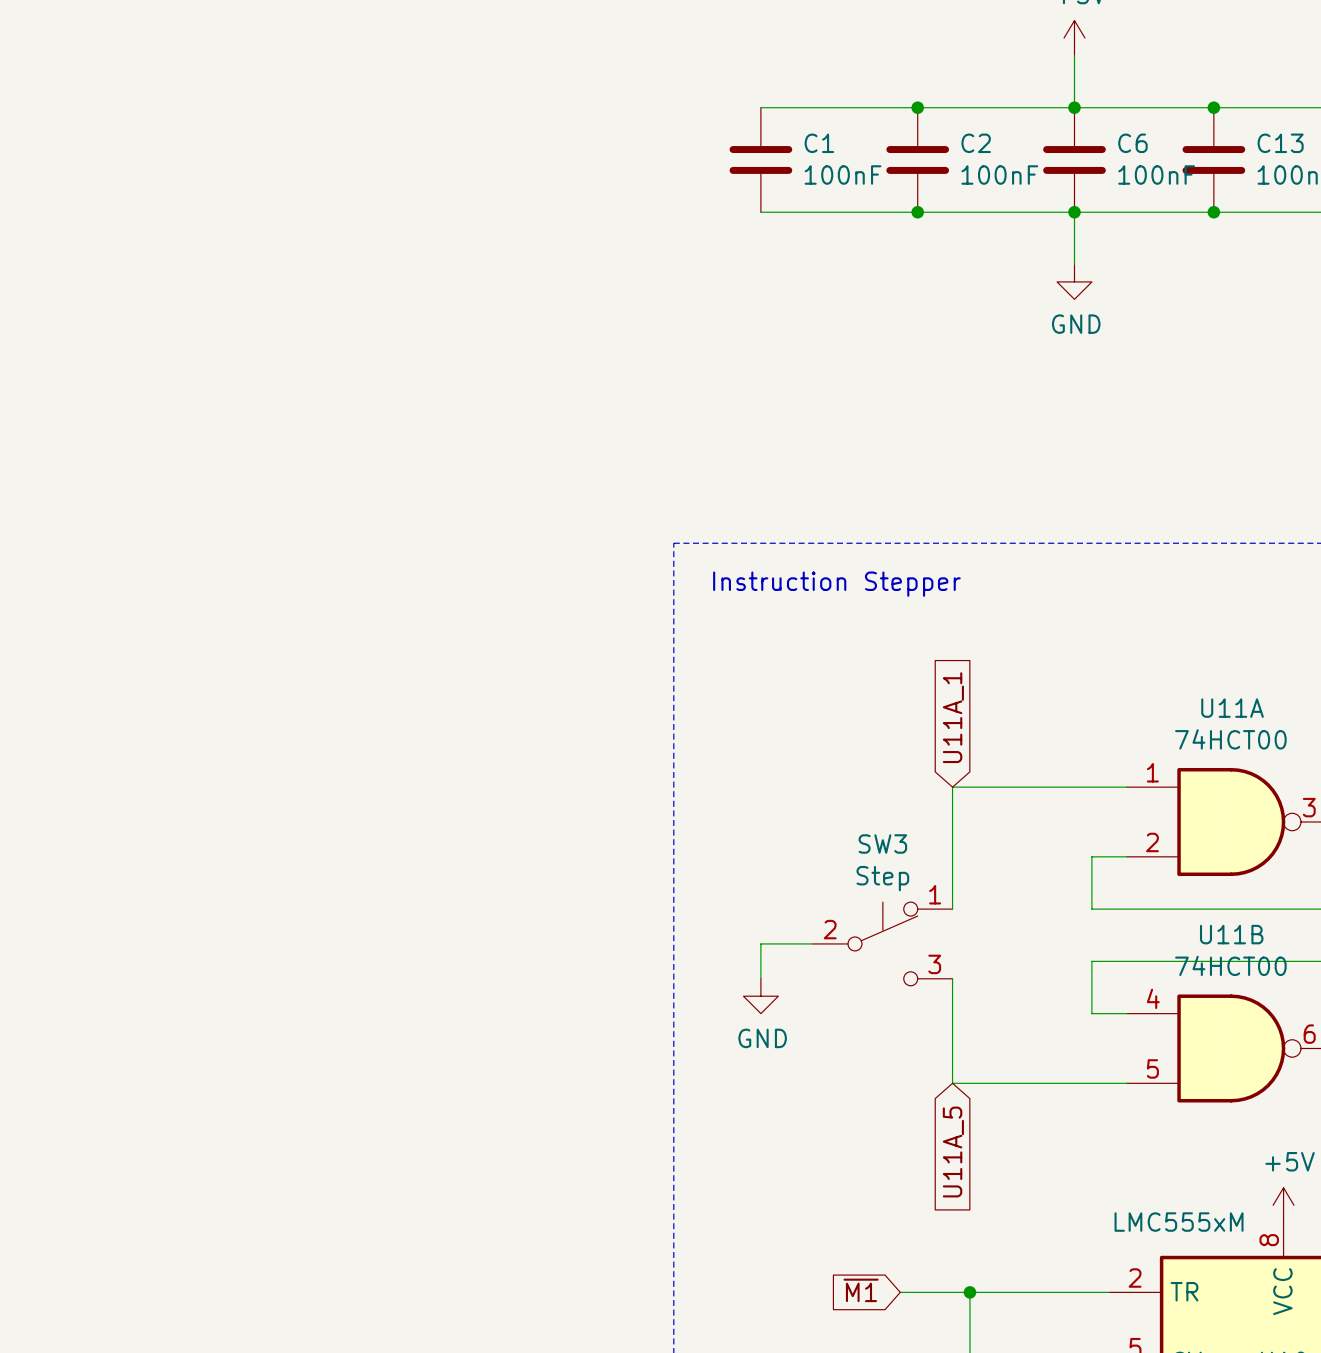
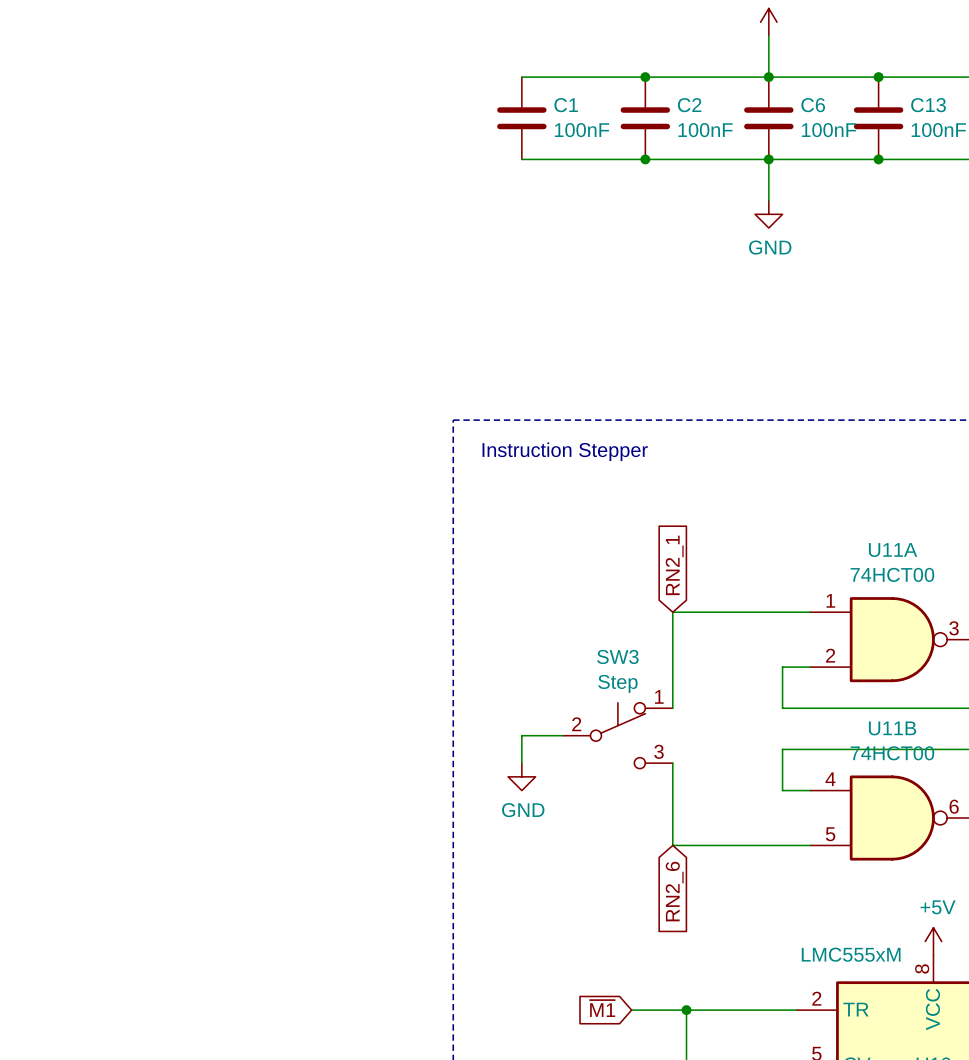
global label: U11A_1 (953, 717) -> RN2_1 (674, 565)
global label: U11A_5 (953, 1152) -> RN2_6 (674, 891)

